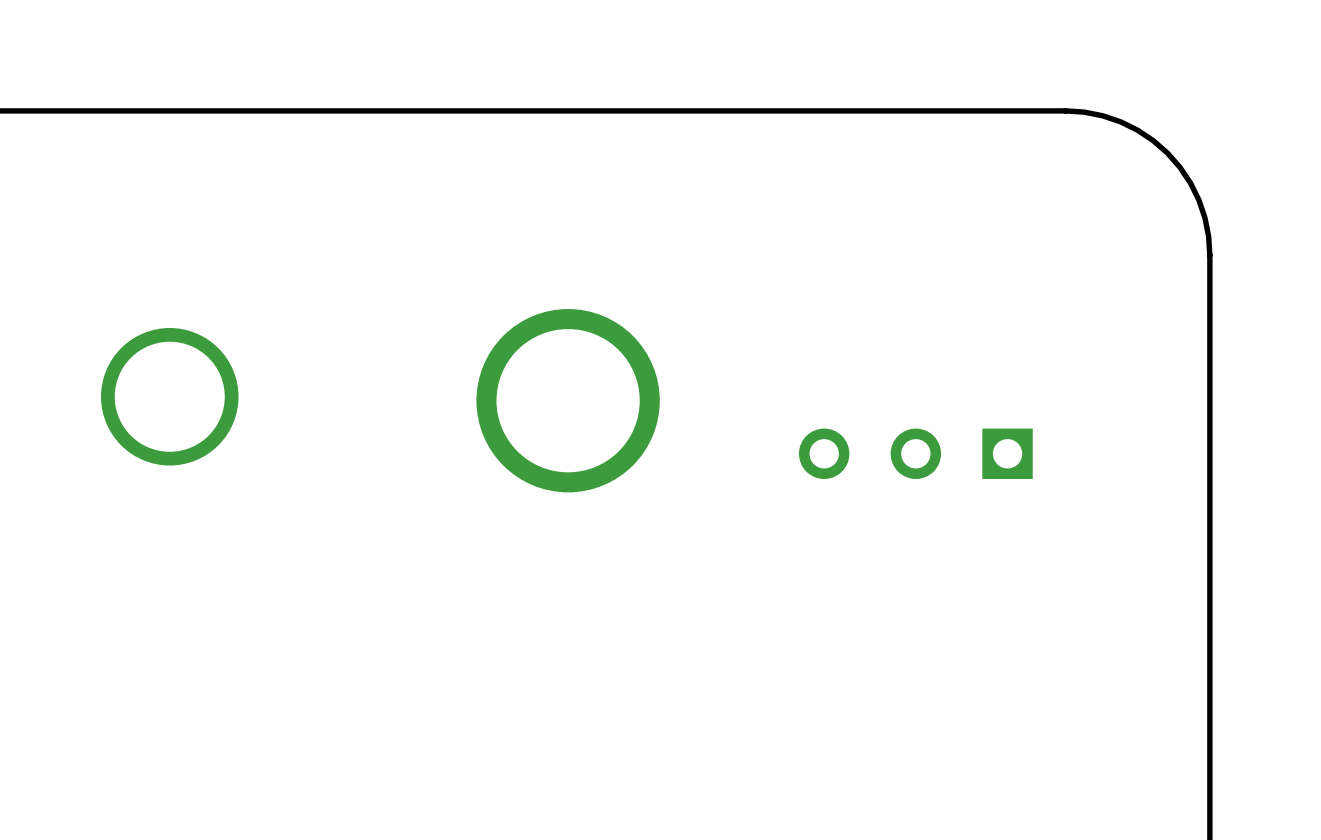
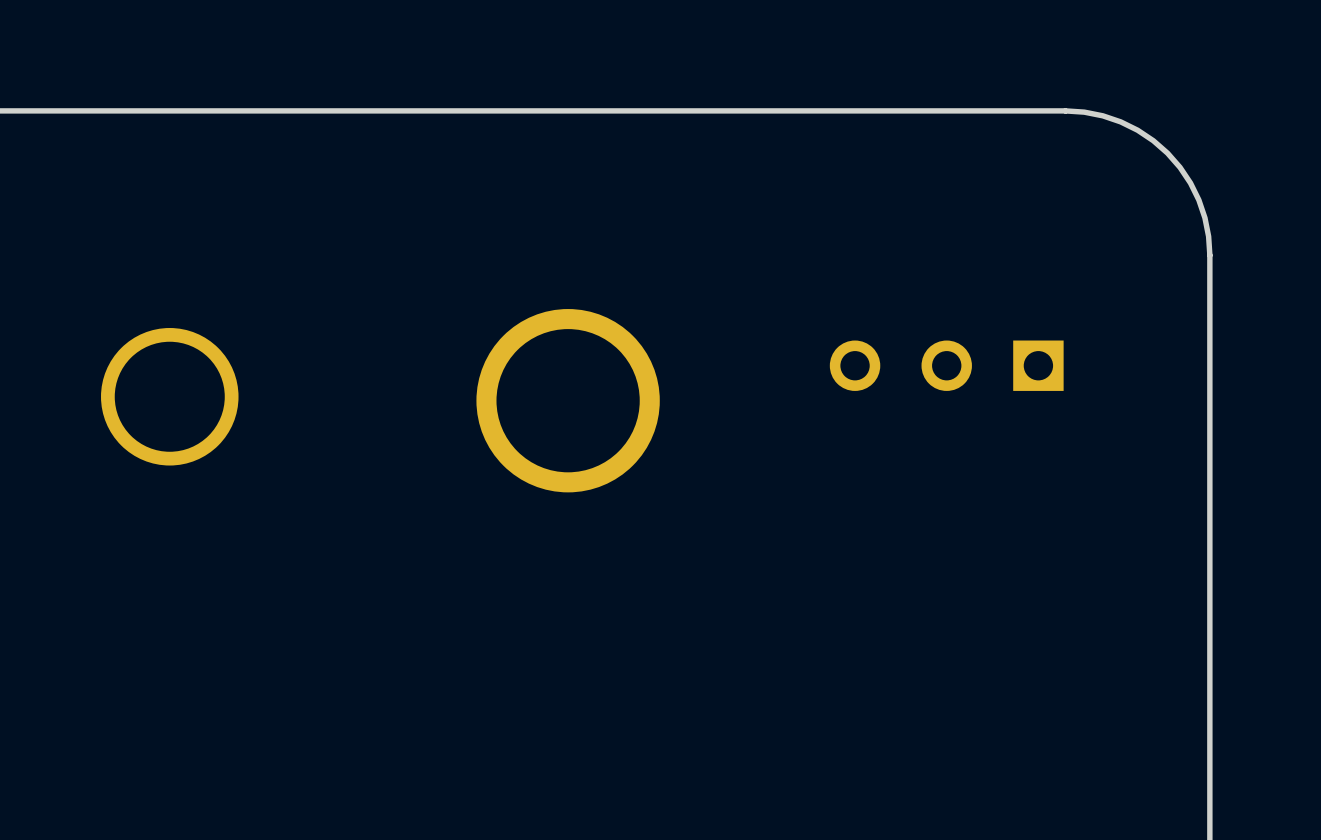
part position: (915, 453) -> (946, 365)

